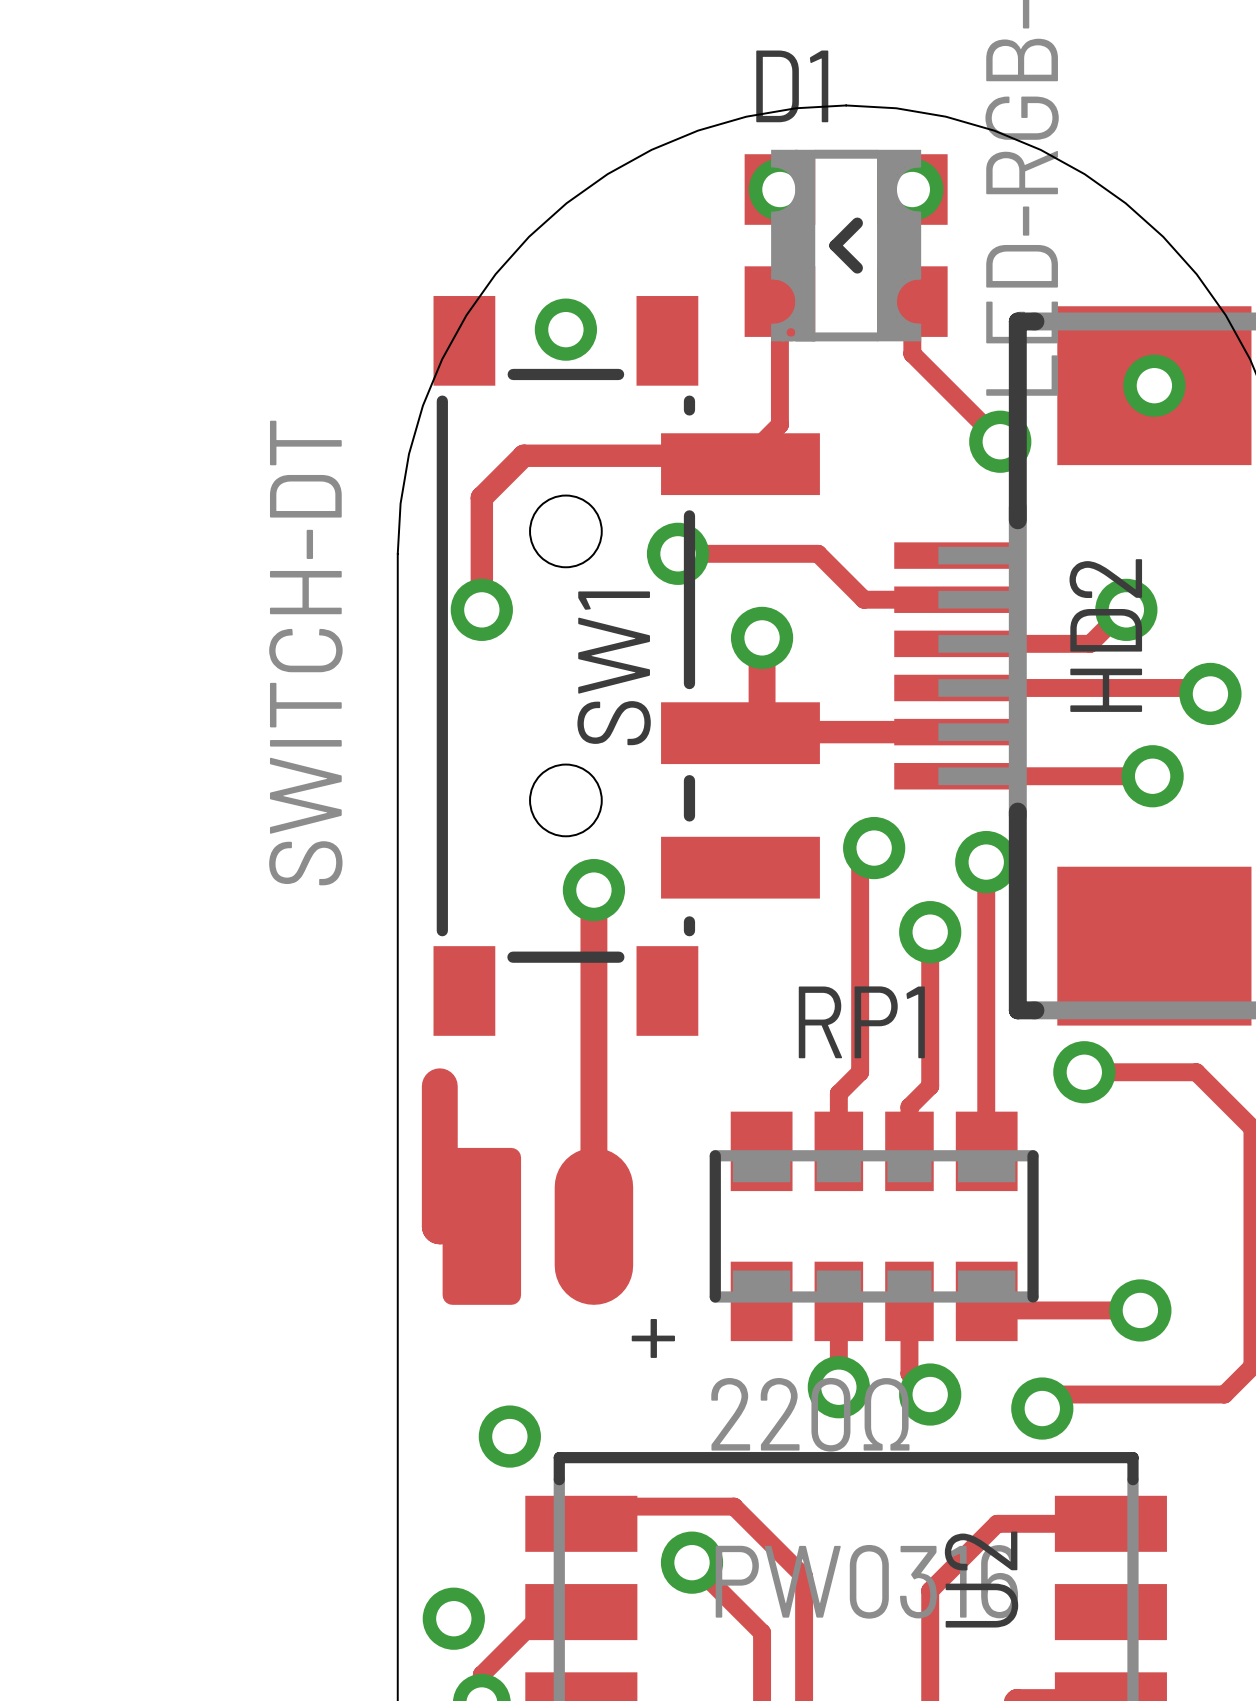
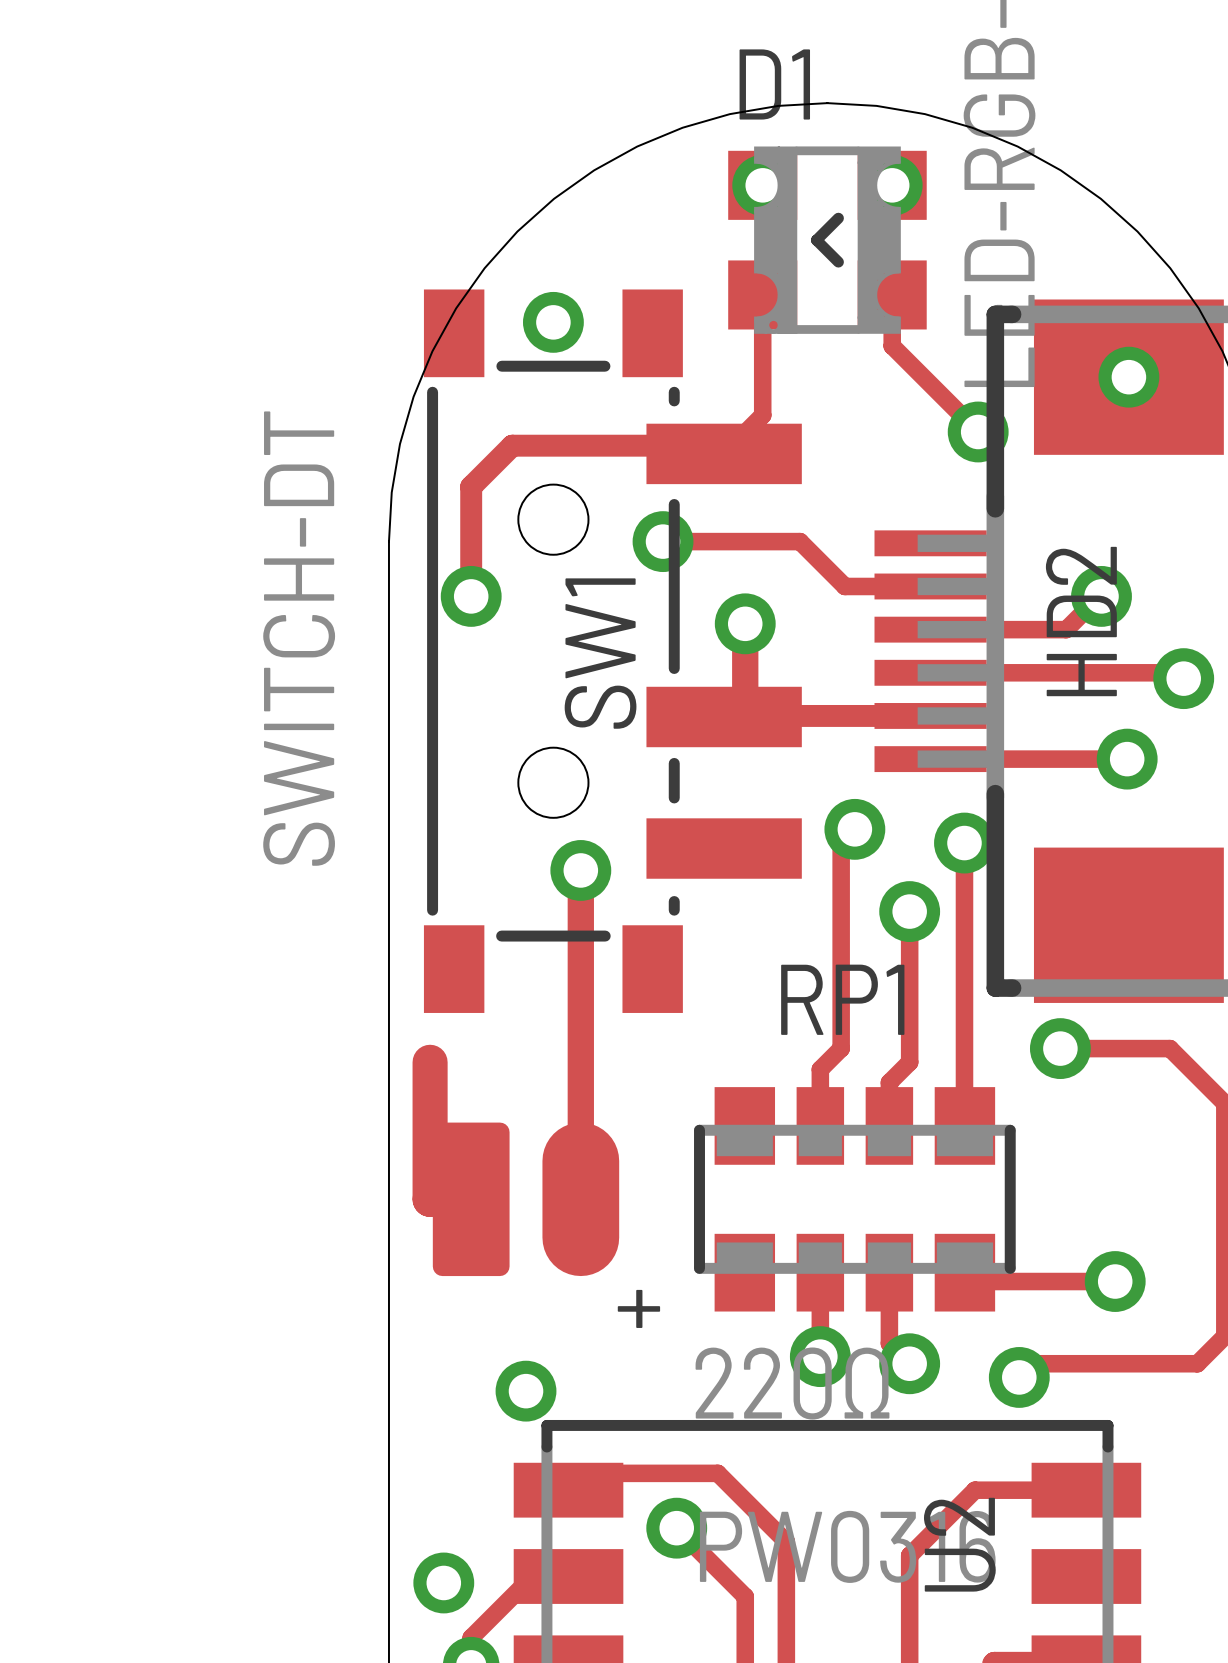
via position: (509, 1436) -> (526, 1391)

